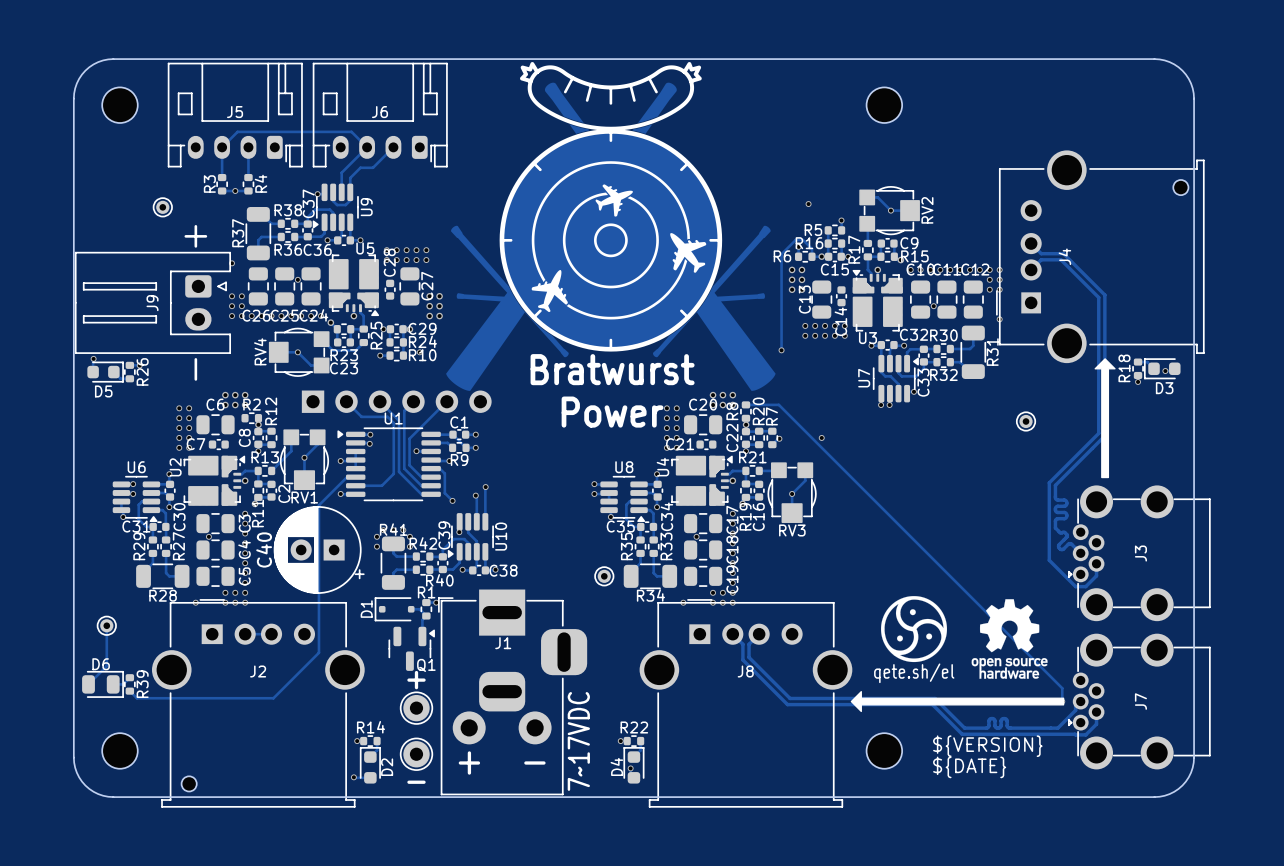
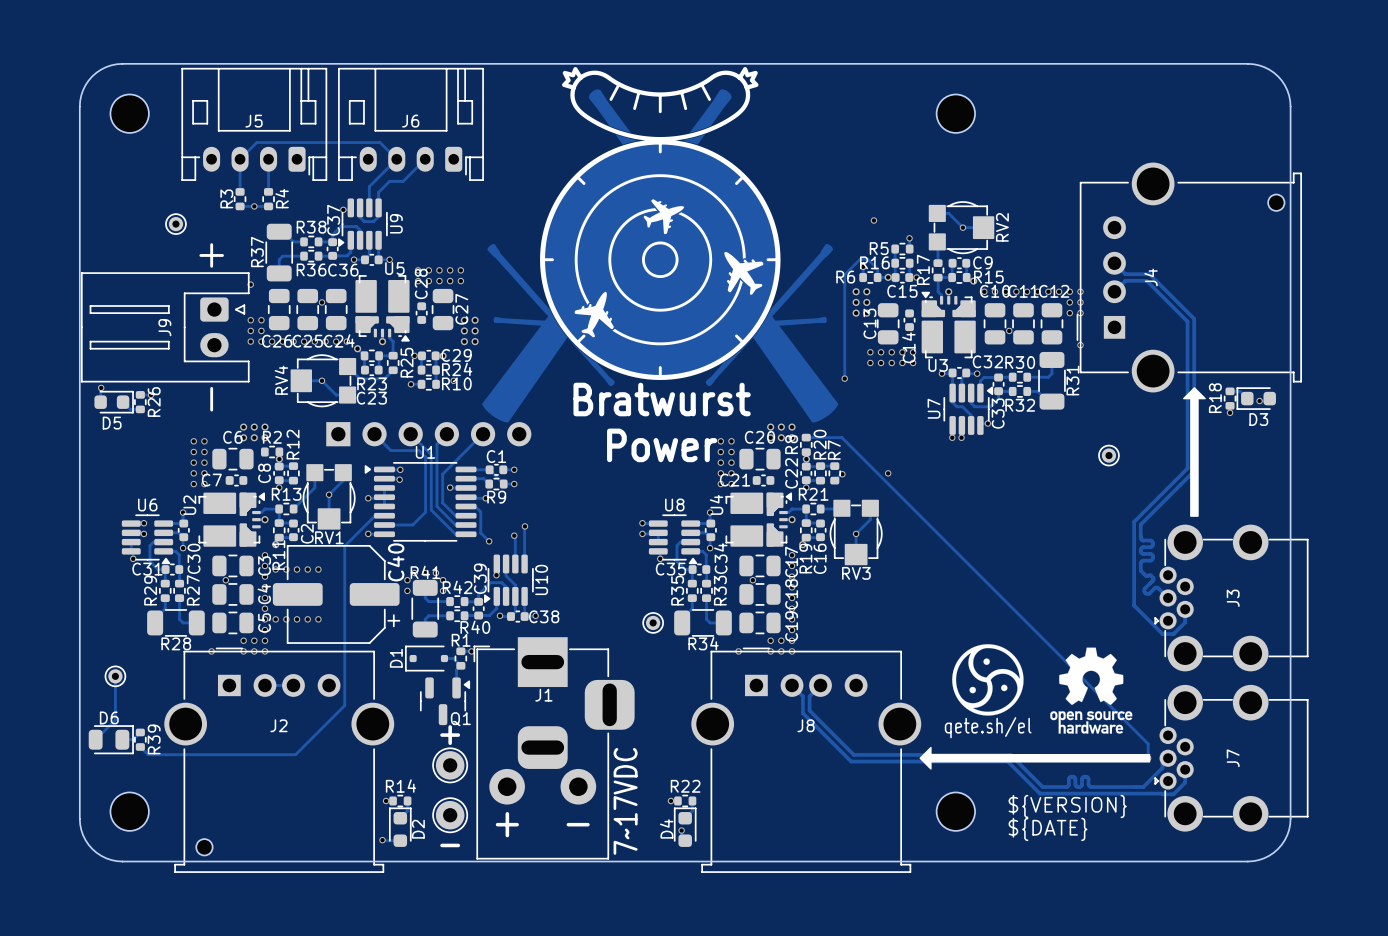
C40 footprint: [273, 506, 365, 594] -> [272, 545, 401, 644]
via: none -> (275, 569)
via: none -> (286, 569)
via: none -> (297, 569)
via: none -> (307, 569)
via: none -> (318, 569)
C40 name position: C40 (264, 549) -> C40 (395, 562)
via: none -> (275, 619)
via: none -> (286, 619)
via: none -> (297, 619)
via: none -> (307, 619)
via: none -> (318, 619)

